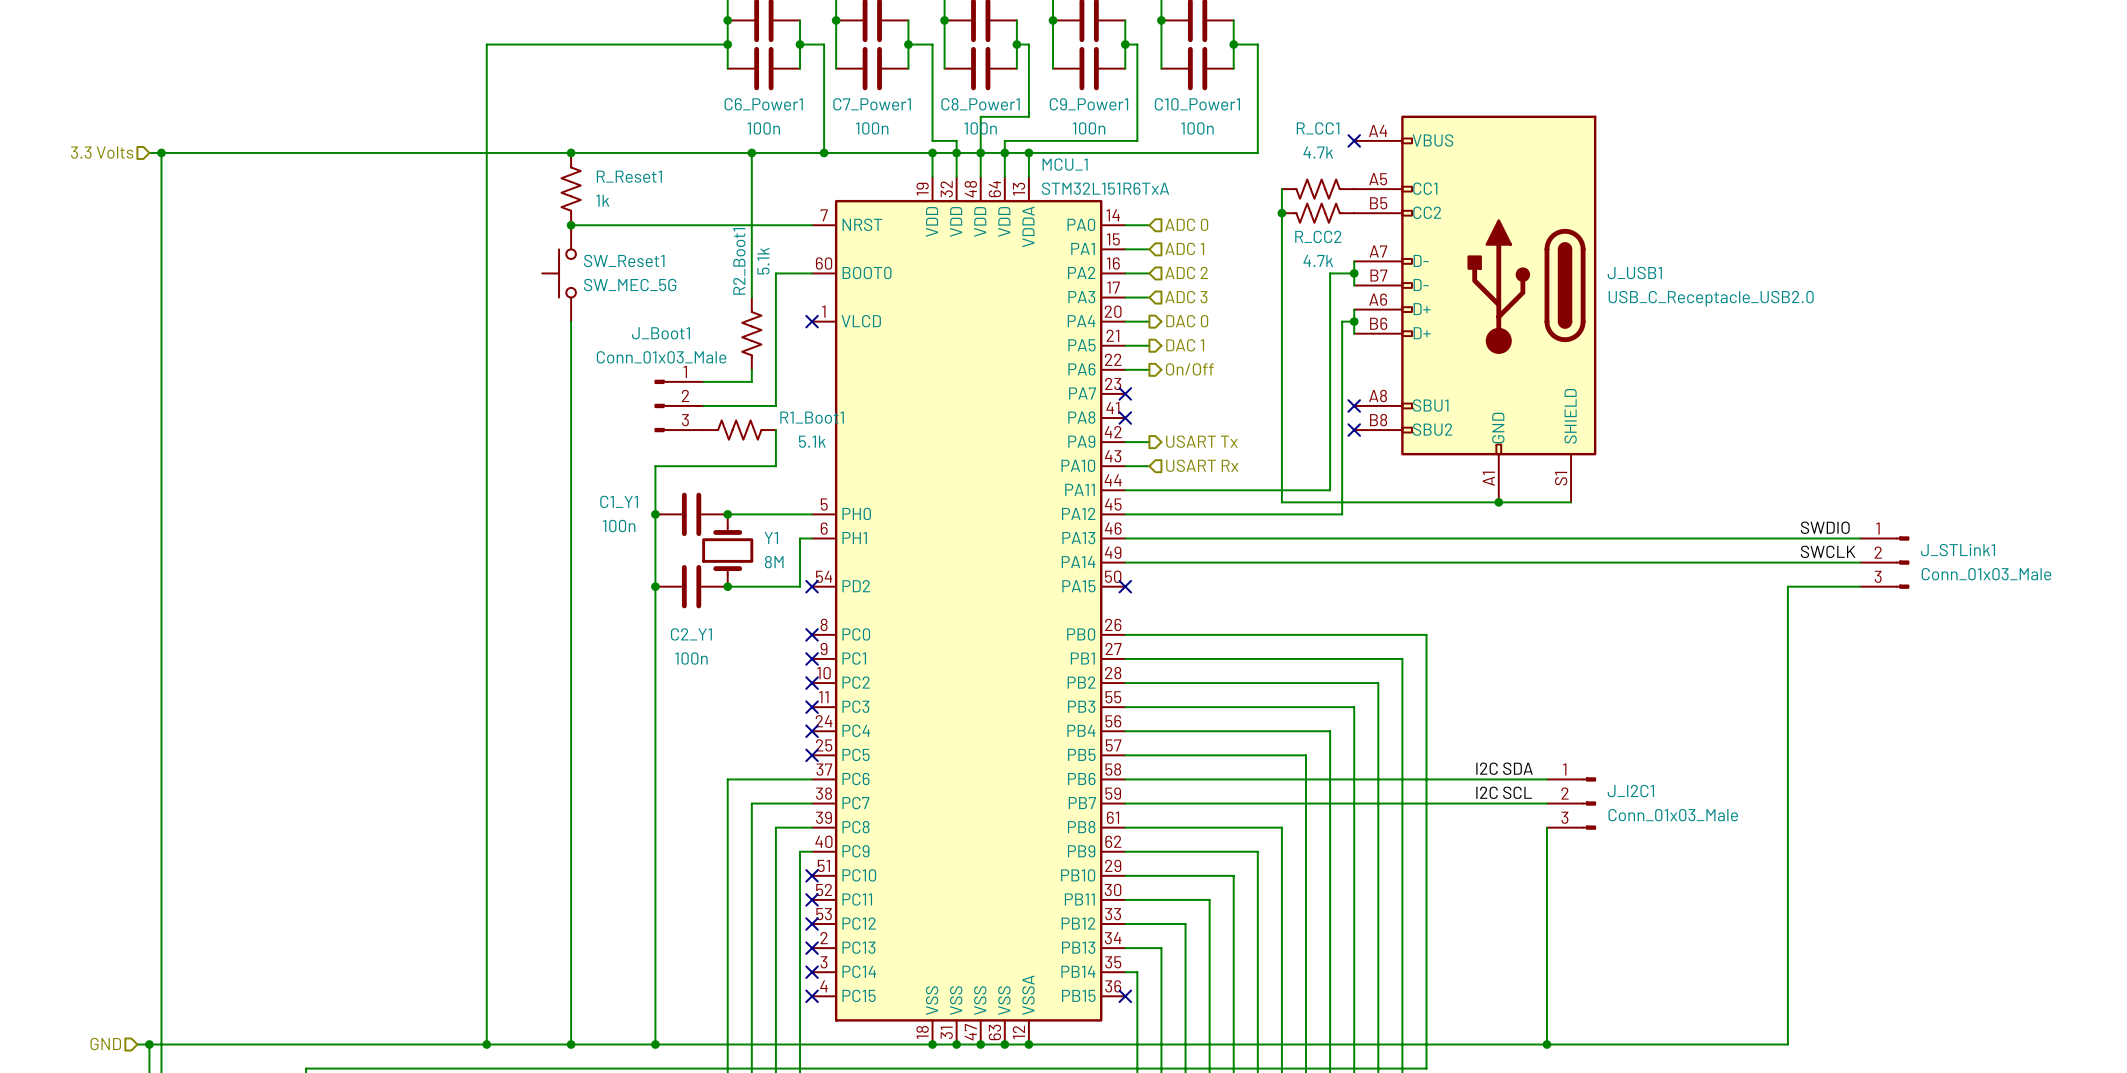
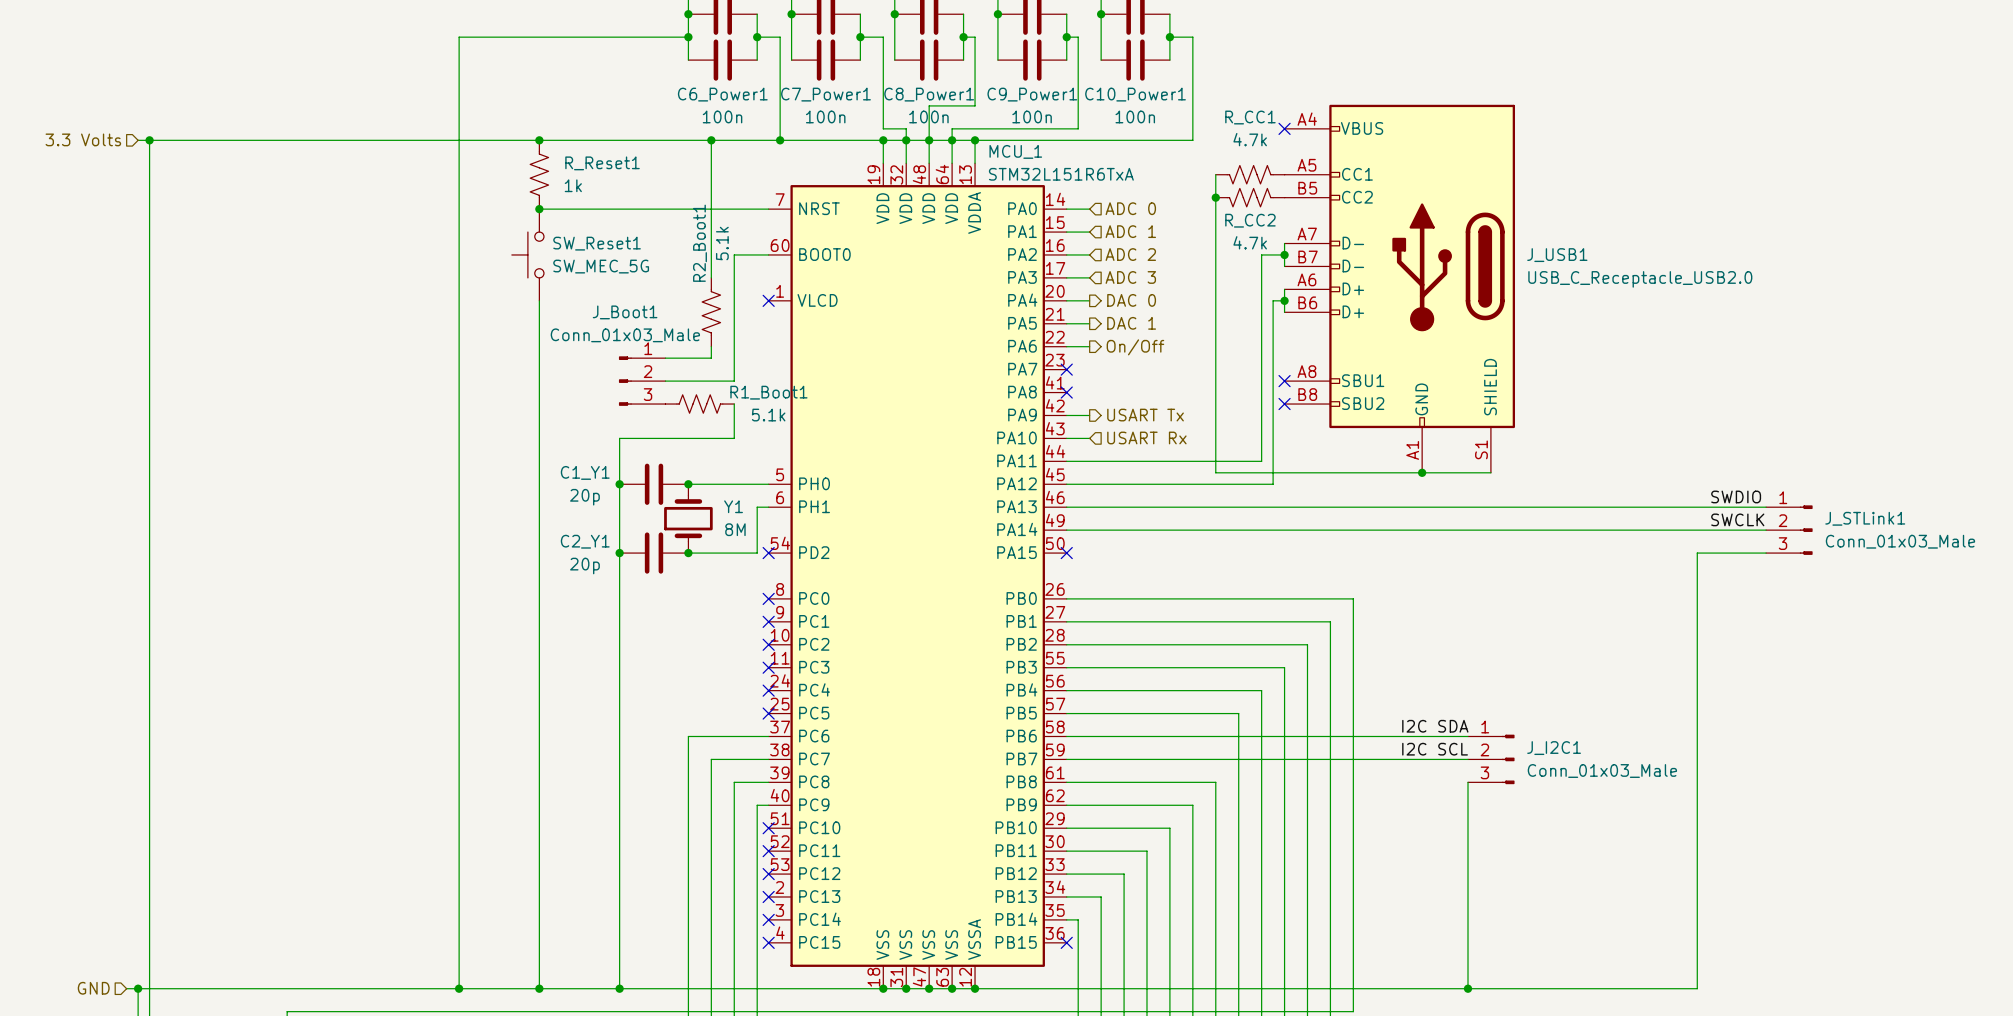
C1_Y1 value: 100n (619, 526) -> 20p (584, 497)
C2_Y1 name position: C2_Y1 (691, 634) -> C2_Y1 (585, 541)
C2_Y1 value: 100n (691, 658) -> 20p (584, 566)

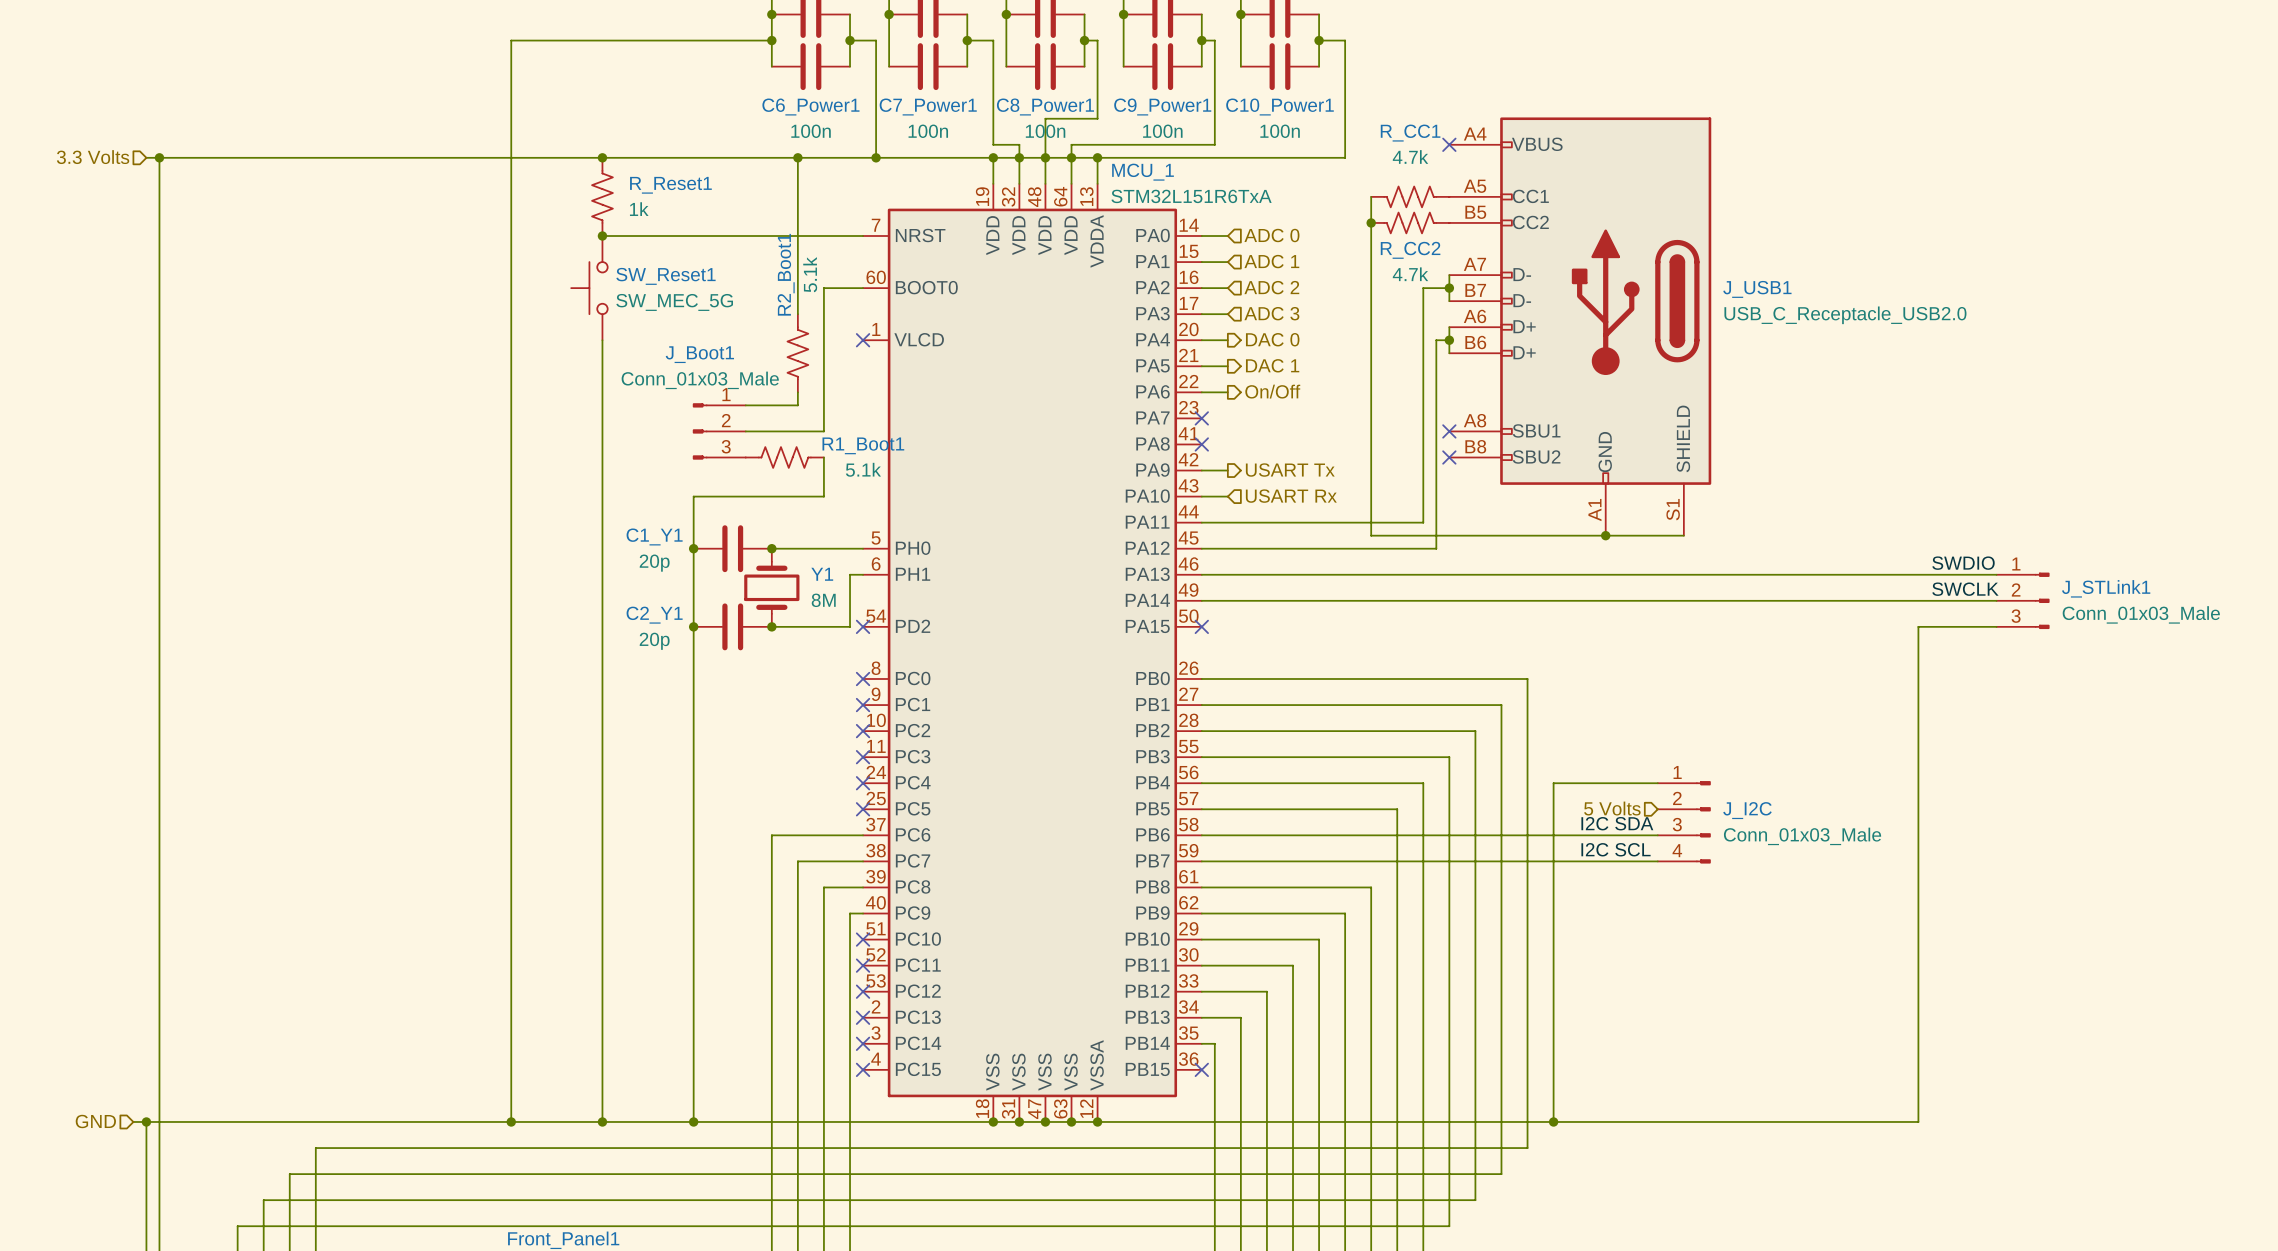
wire: none -> (1657, 783) (1553, 783) (1553, 1121)
hierarchical label: none -> 5 Volts (1612, 808)
J_I2C: none -> Conn_01x03_Male (1684, 822)
J_I2C1: Conn_01x03_Male (1491, 759) -> none
wire: (1468, 782) (1468, 988) -> none
junction: none -> (1553, 1121)
junction: (1468, 988) -> none

